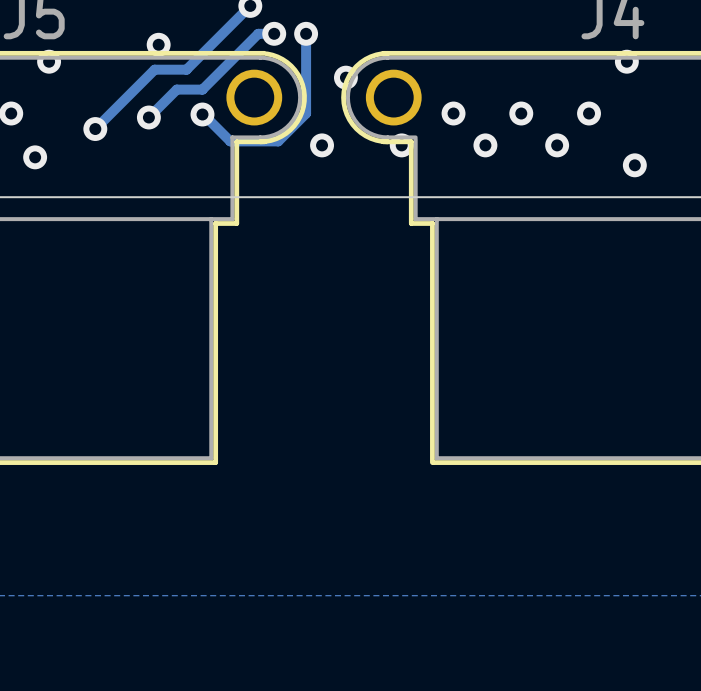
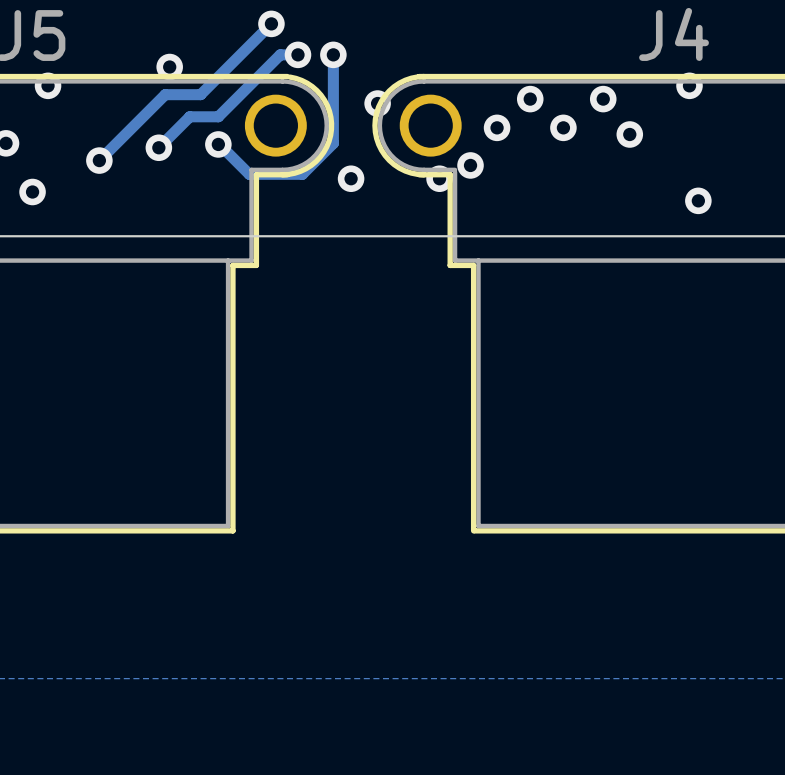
via: none -> (530, 99)
via: none -> (603, 99)
via position: (453, 113) -> (497, 127)
via position: (521, 113) -> (563, 127)
via position: (589, 113) -> (629, 134)
via: none -> (470, 165)
via: (485, 145) -> none
via: (557, 145) -> none

